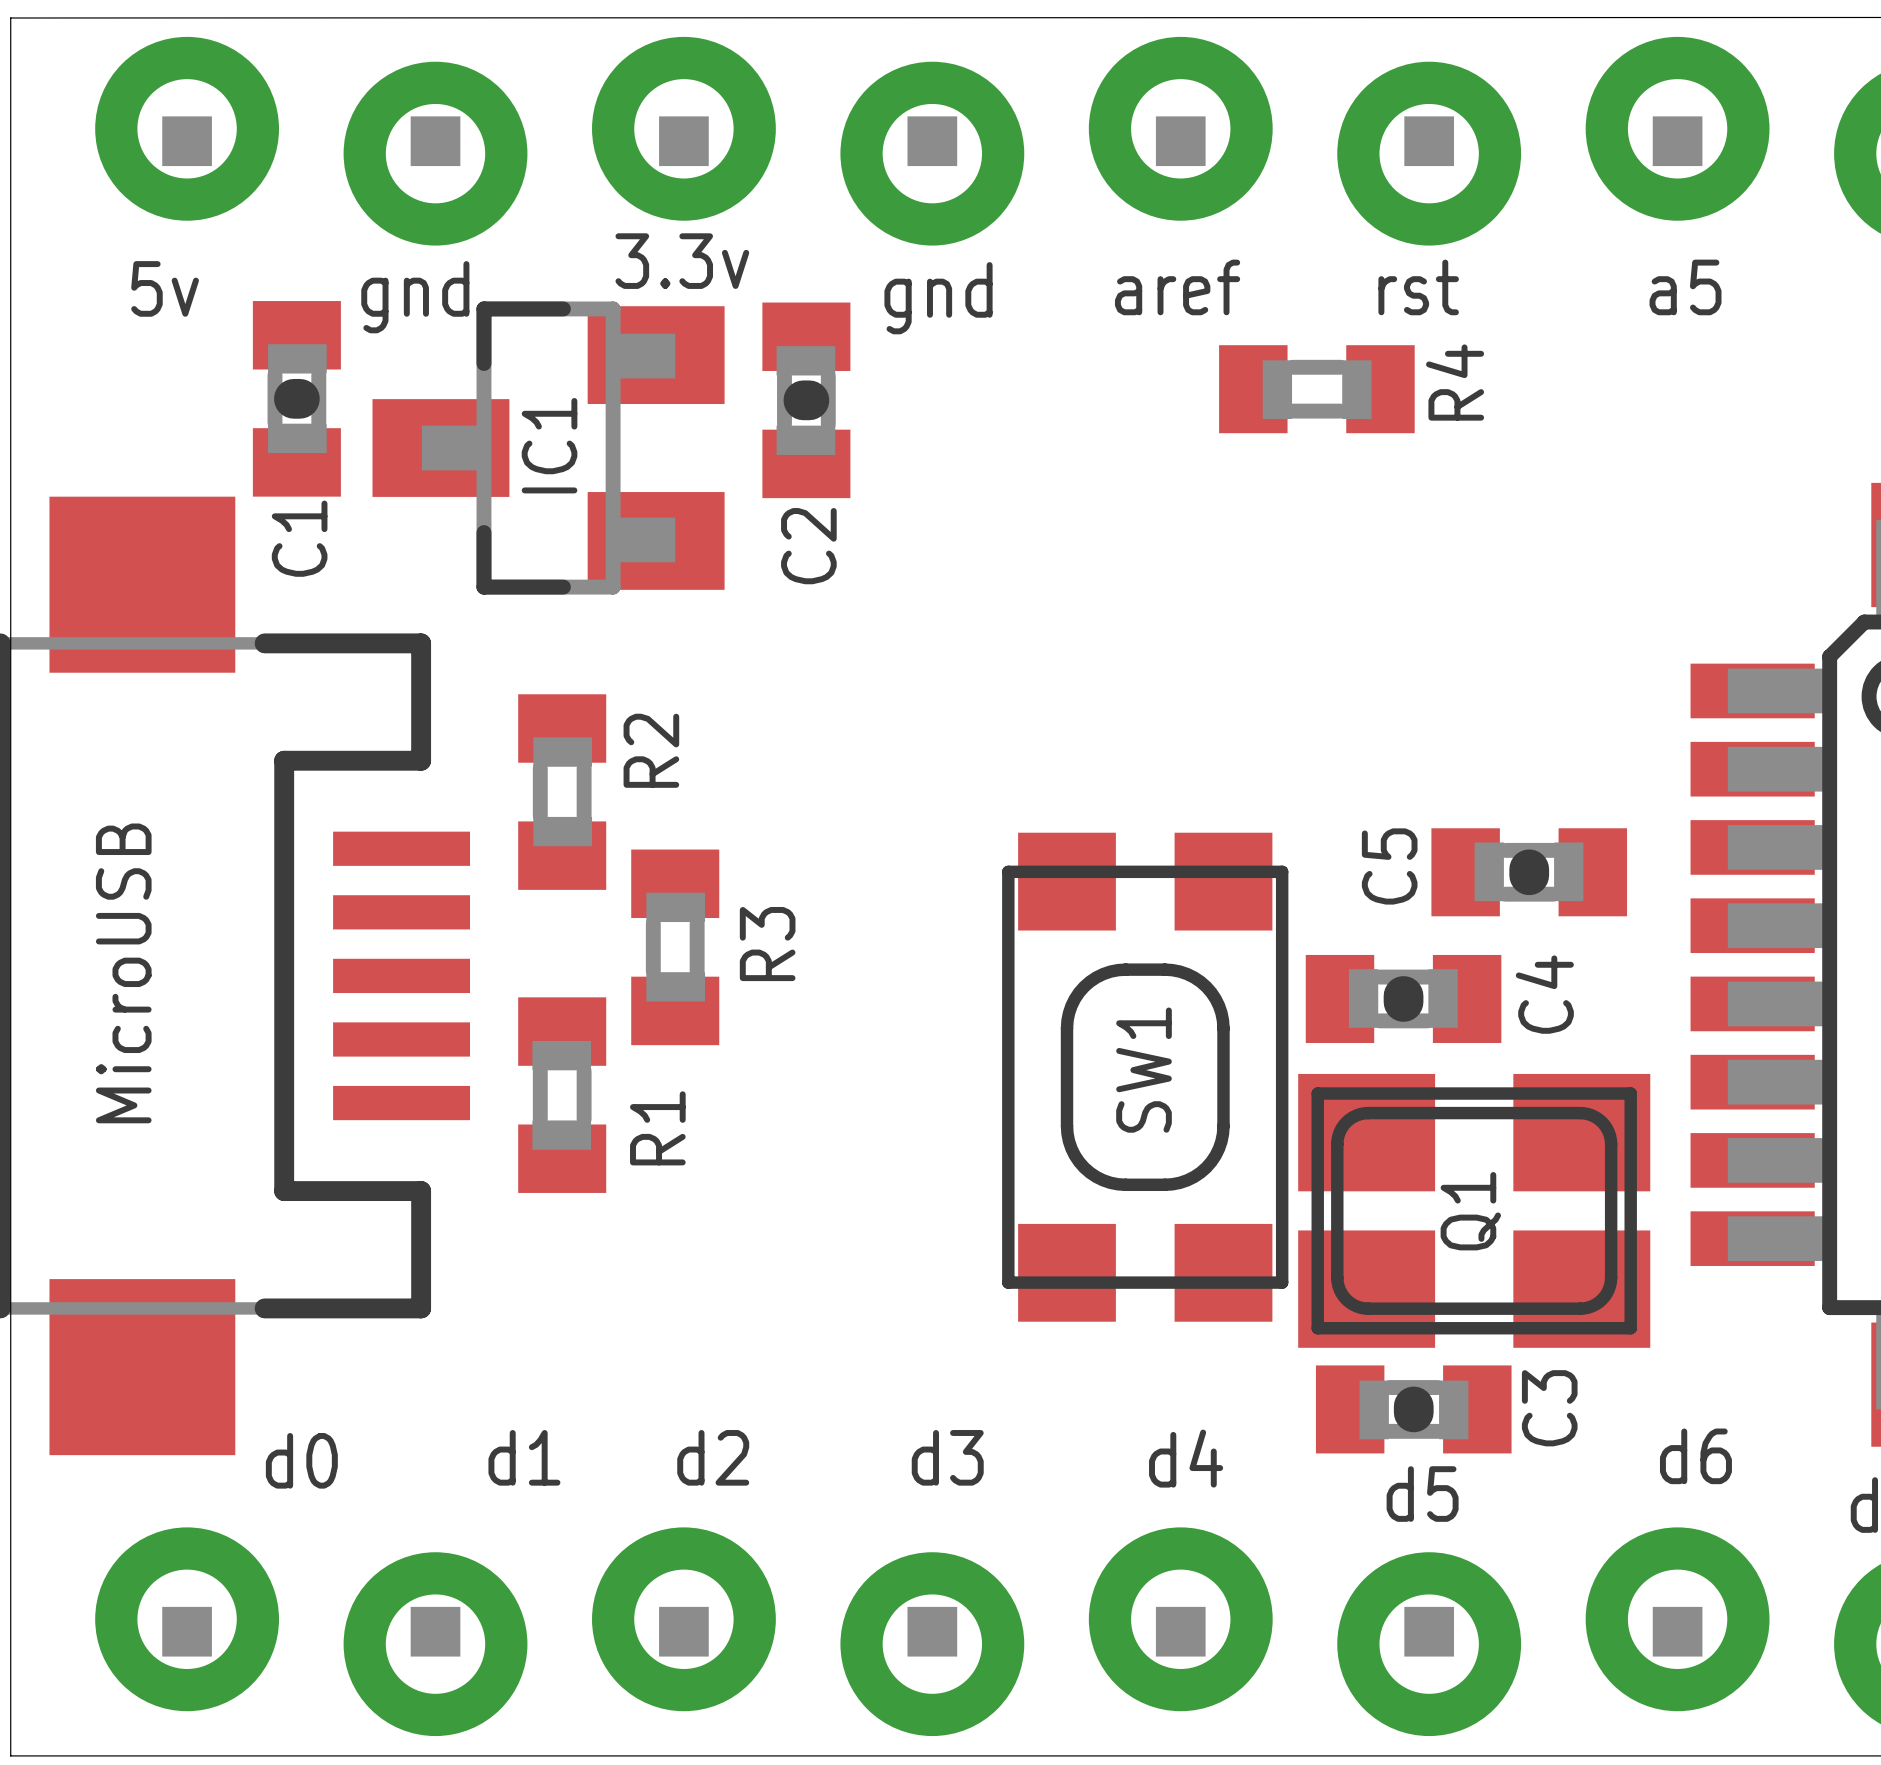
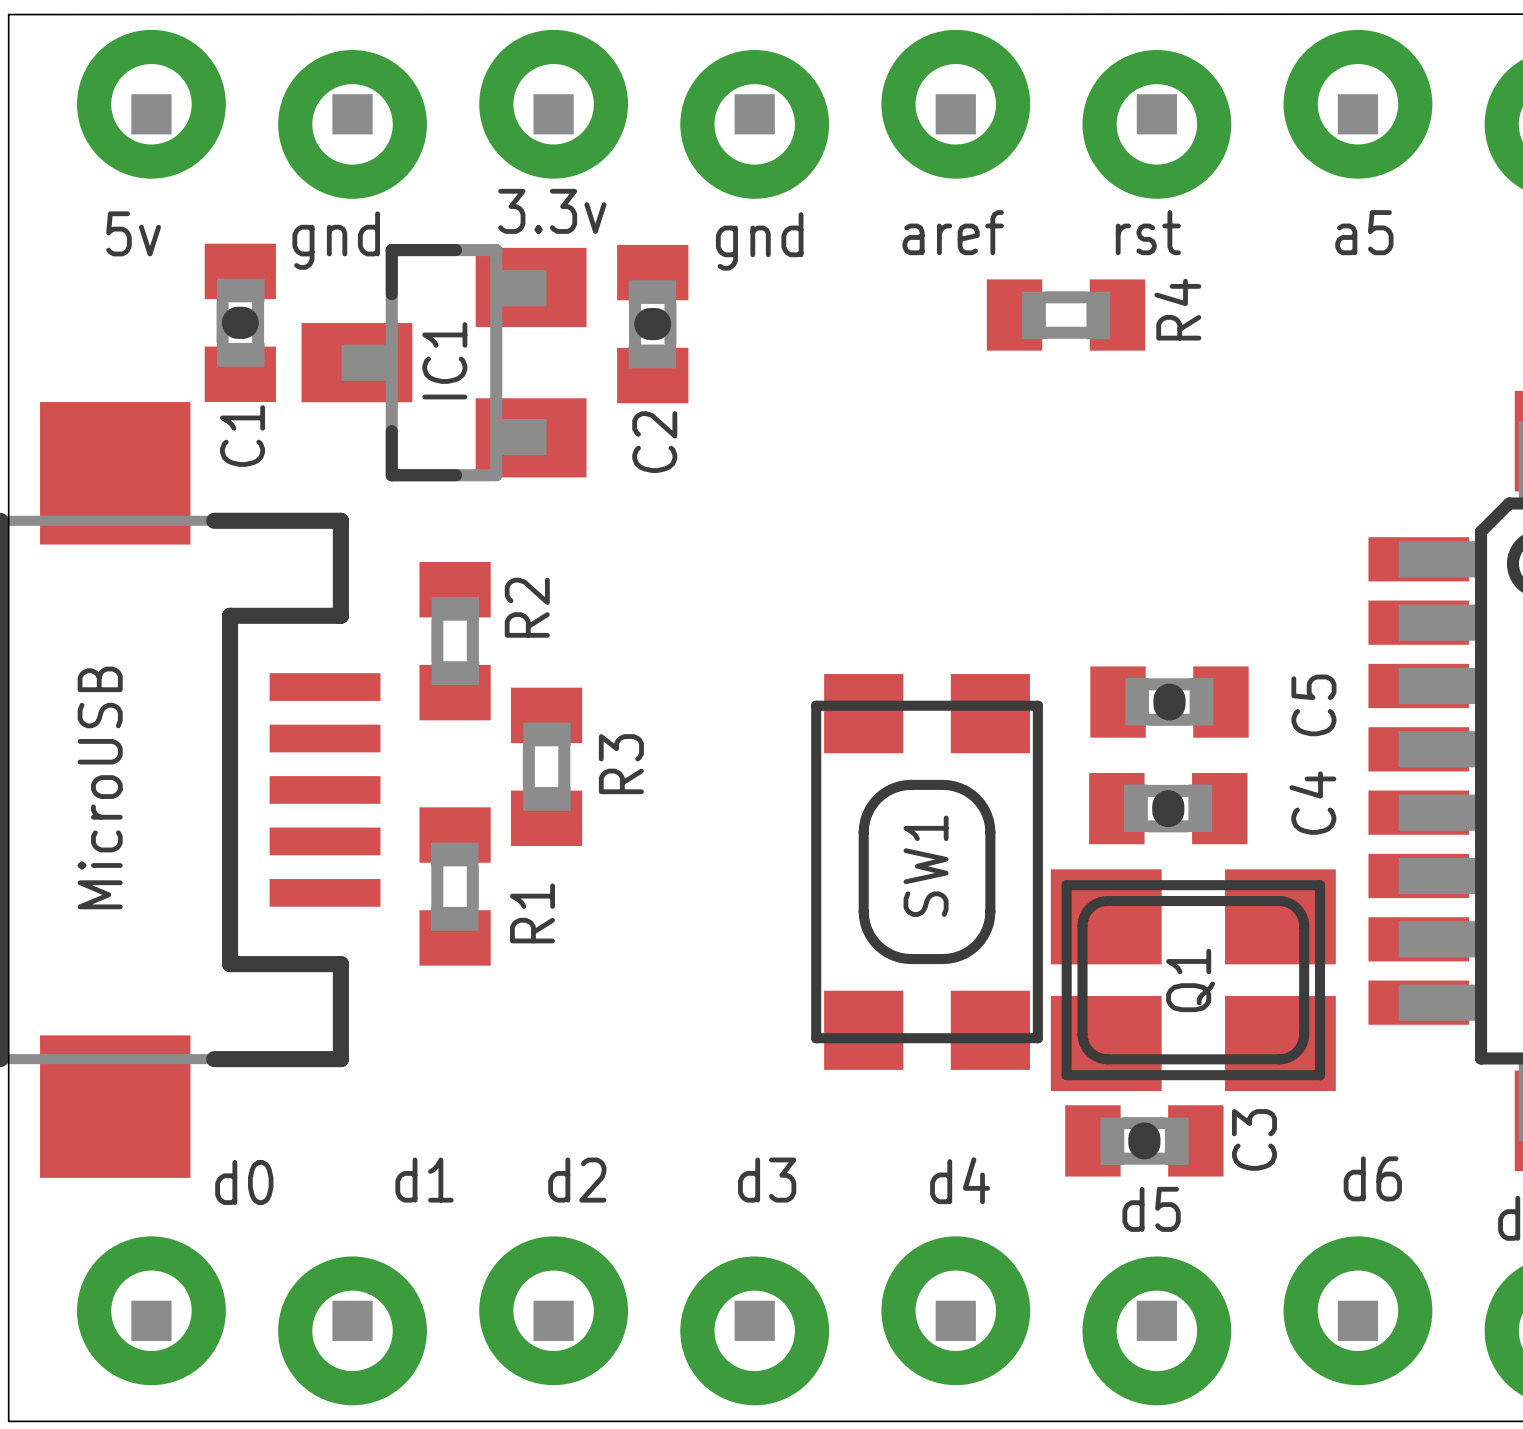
text position: C5 (1389, 866) -> C5 (1313, 705)
part position: (1529, 872) -> (1169, 702)
text position: C4 (1544, 994) -> C4 (1312, 803)
part position: (1403, 998) -> (1168, 808)

